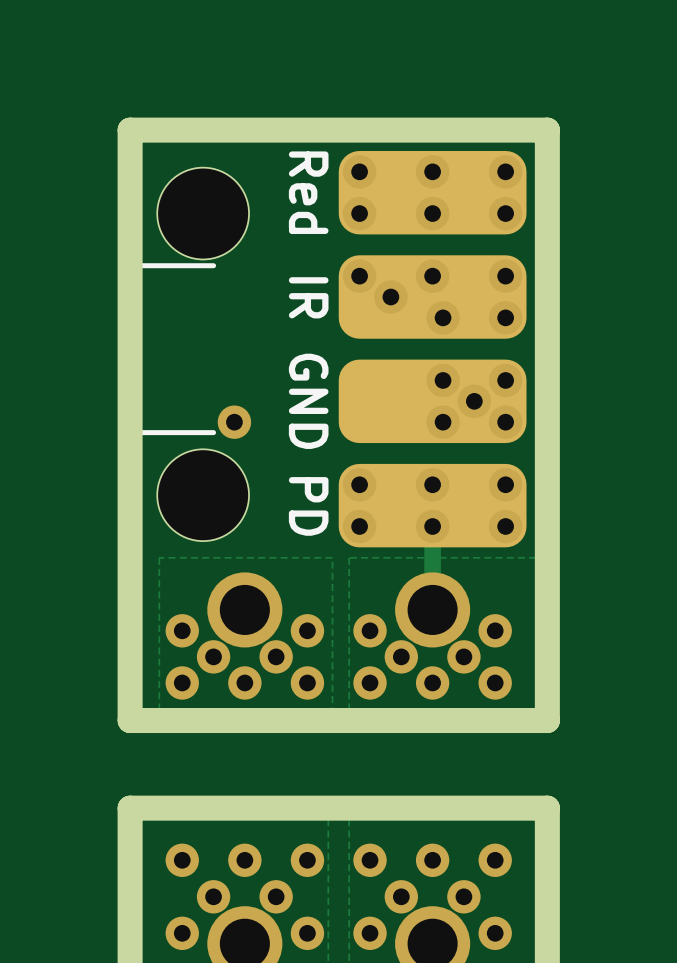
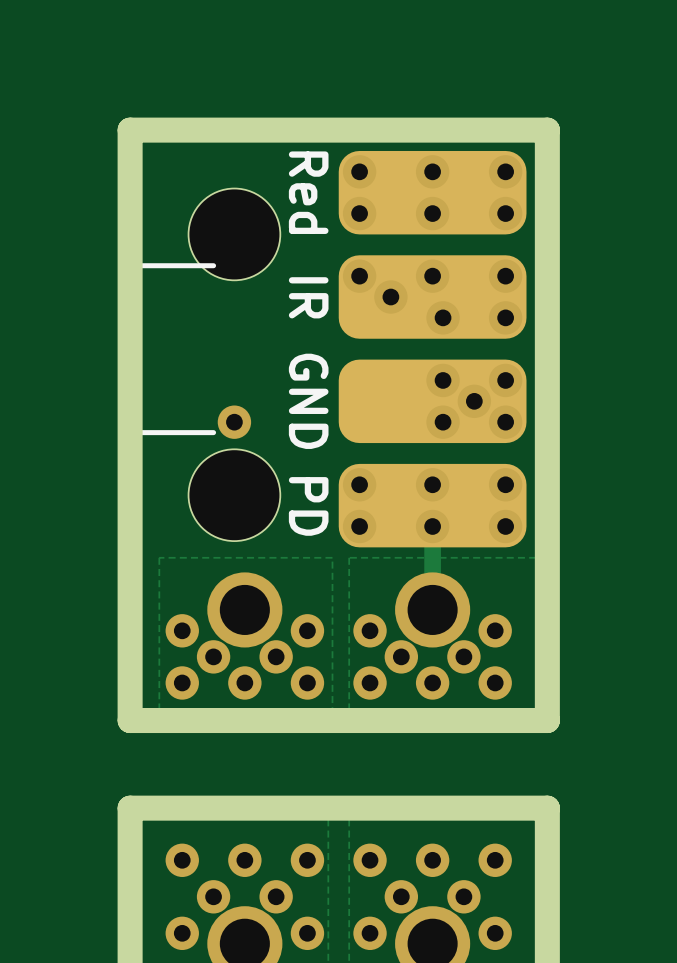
part position: (203, 213) -> (234, 234)
part position: (203, 495) -> (234, 495)

